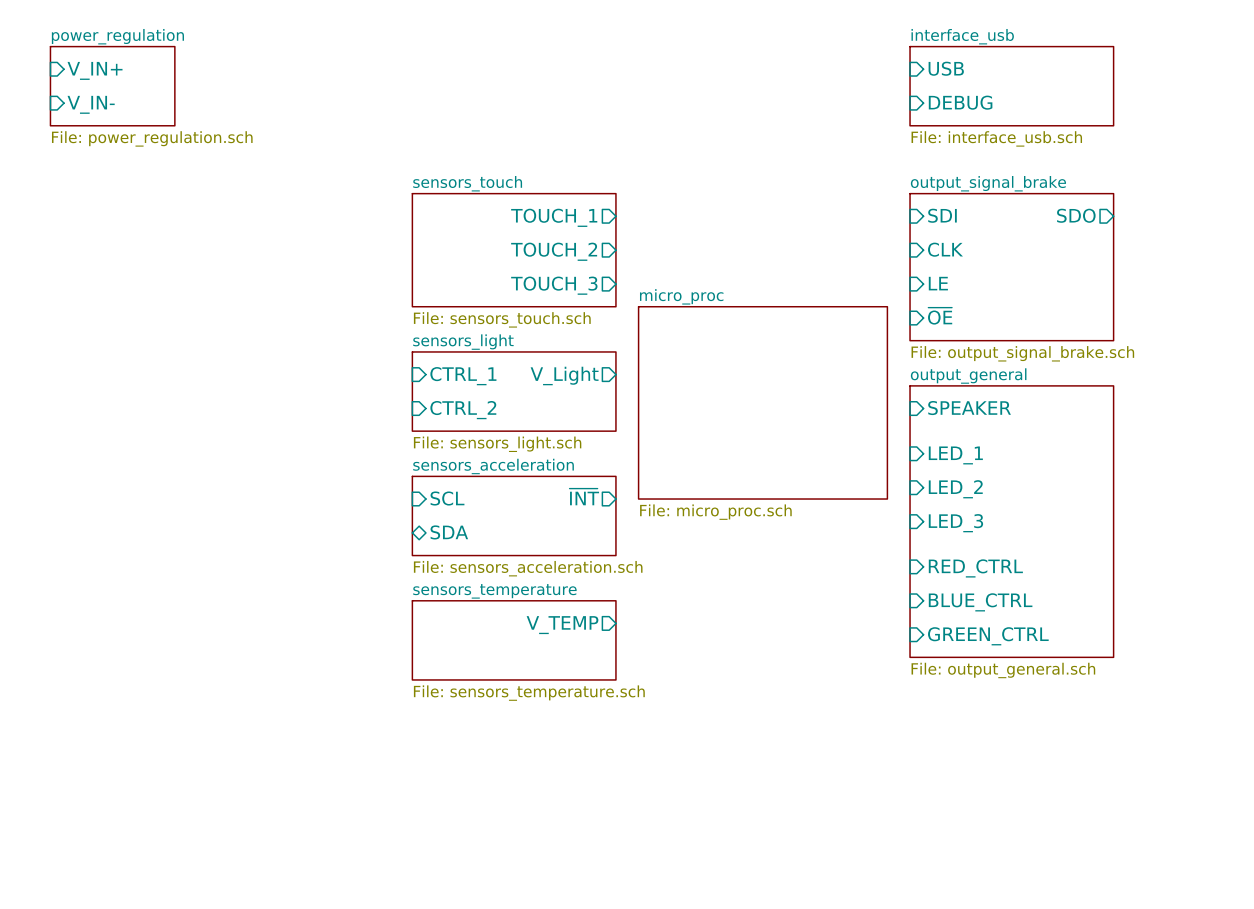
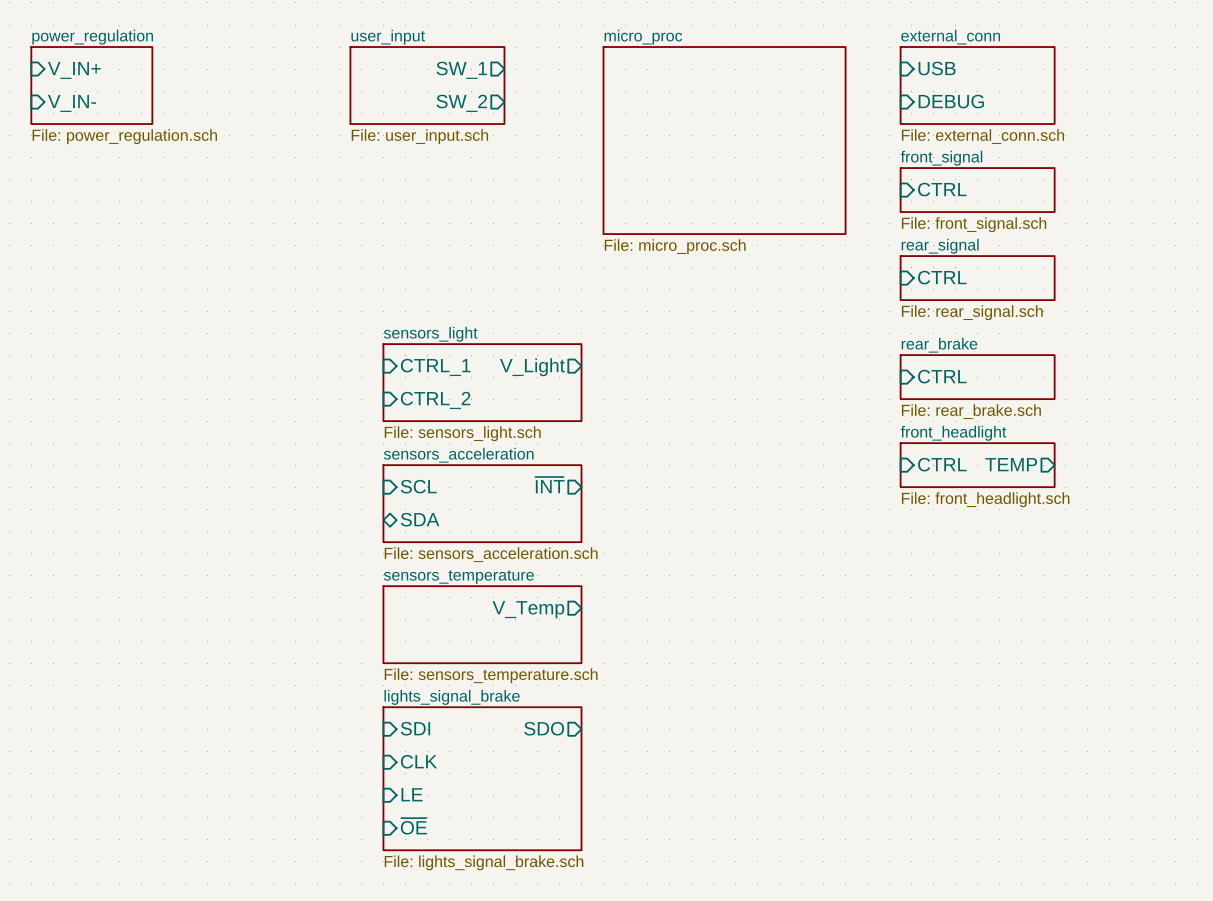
sheet pin position: USB (946, 68) -> USB (937, 68)
sheet pin: none -> SW_1 (461, 70)
sheet user_input: none -> File: user_input.sch (427, 85)
sheet interface_usb: File: interface_usb.sch (1011, 86) -> none
sheet external_conn: none -> File: external_conn.sch (977, 85)
sheet pin position: DEBUG (960, 102) -> DEBUG (951, 101)
sheet pin: none -> SW_2 (461, 103)
sheet micro_proc: none -> File: micro_proc.sch (724, 140)
sheet pin: none -> CTRL (942, 189)
sheet front_signal: none -> File: front_signal.sch (977, 190)
sheet pin: SDI (942, 215) -> none
sheet pin: SDO (1076, 215) -> none
sheet pin: TOUCH_1 (554, 217) -> none
sheet pin: CLK (945, 249) -> none
sheet sensors_touch: File: sensors_touch.sch (514, 250) -> none
sheet pin: TOUCH_2 (554, 251) -> none
sheet output_signal_brake: File: output_signal_brake.sch (1011, 267) -> none
sheet pin: LE (938, 283) -> none
sheet pin: none -> CTRL (942, 277)
sheet rear_signal: none -> File: rear_signal.sch (977, 278)
sheet pin: TOUCH_3 (554, 285) -> none
sheet pin: ~{OE} (940, 316) -> none
sheet pin: none -> CTRL (942, 376)
sheet rear_brake: none -> File: rear_brake.sch (977, 377)
sheet micro_proc: File: micro_proc.sch (762, 402) -> none
sheet pin: SPEAKER (969, 408) -> none
sheet pin: LED_1 (955, 455) -> none
sheet pin: none -> CTRL (942, 464)
sheet pin: none -> TEMP (1011, 464)
sheet front_headlight: none -> File: front_headlight.sch (977, 465)
sheet pin: LED_2 (955, 489) -> none
sheet output_general: File: output_general.sch (1011, 521) -> none
sheet pin: LED_3 (955, 523) -> none
sheet pin: RED_CTRL (975, 568) -> none
sheet pin: BLUE_CTRL (980, 602) -> none
sheet pin: V_TEMP (562, 625) -> V_Temp (528, 609)
sheet pin: GREEN_CTRL (988, 636) -> none
sheet pin: none -> SDI (415, 728)
sheet pin: none -> SDO (544, 728)
sheet pin: none -> CLK (418, 761)
sheet lights_signal_brake: none -> File: lights_signal_brake.sch (482, 778)
sheet pin: none -> LE (412, 794)
sheet pin: none -> ~{OE} (413, 826)

